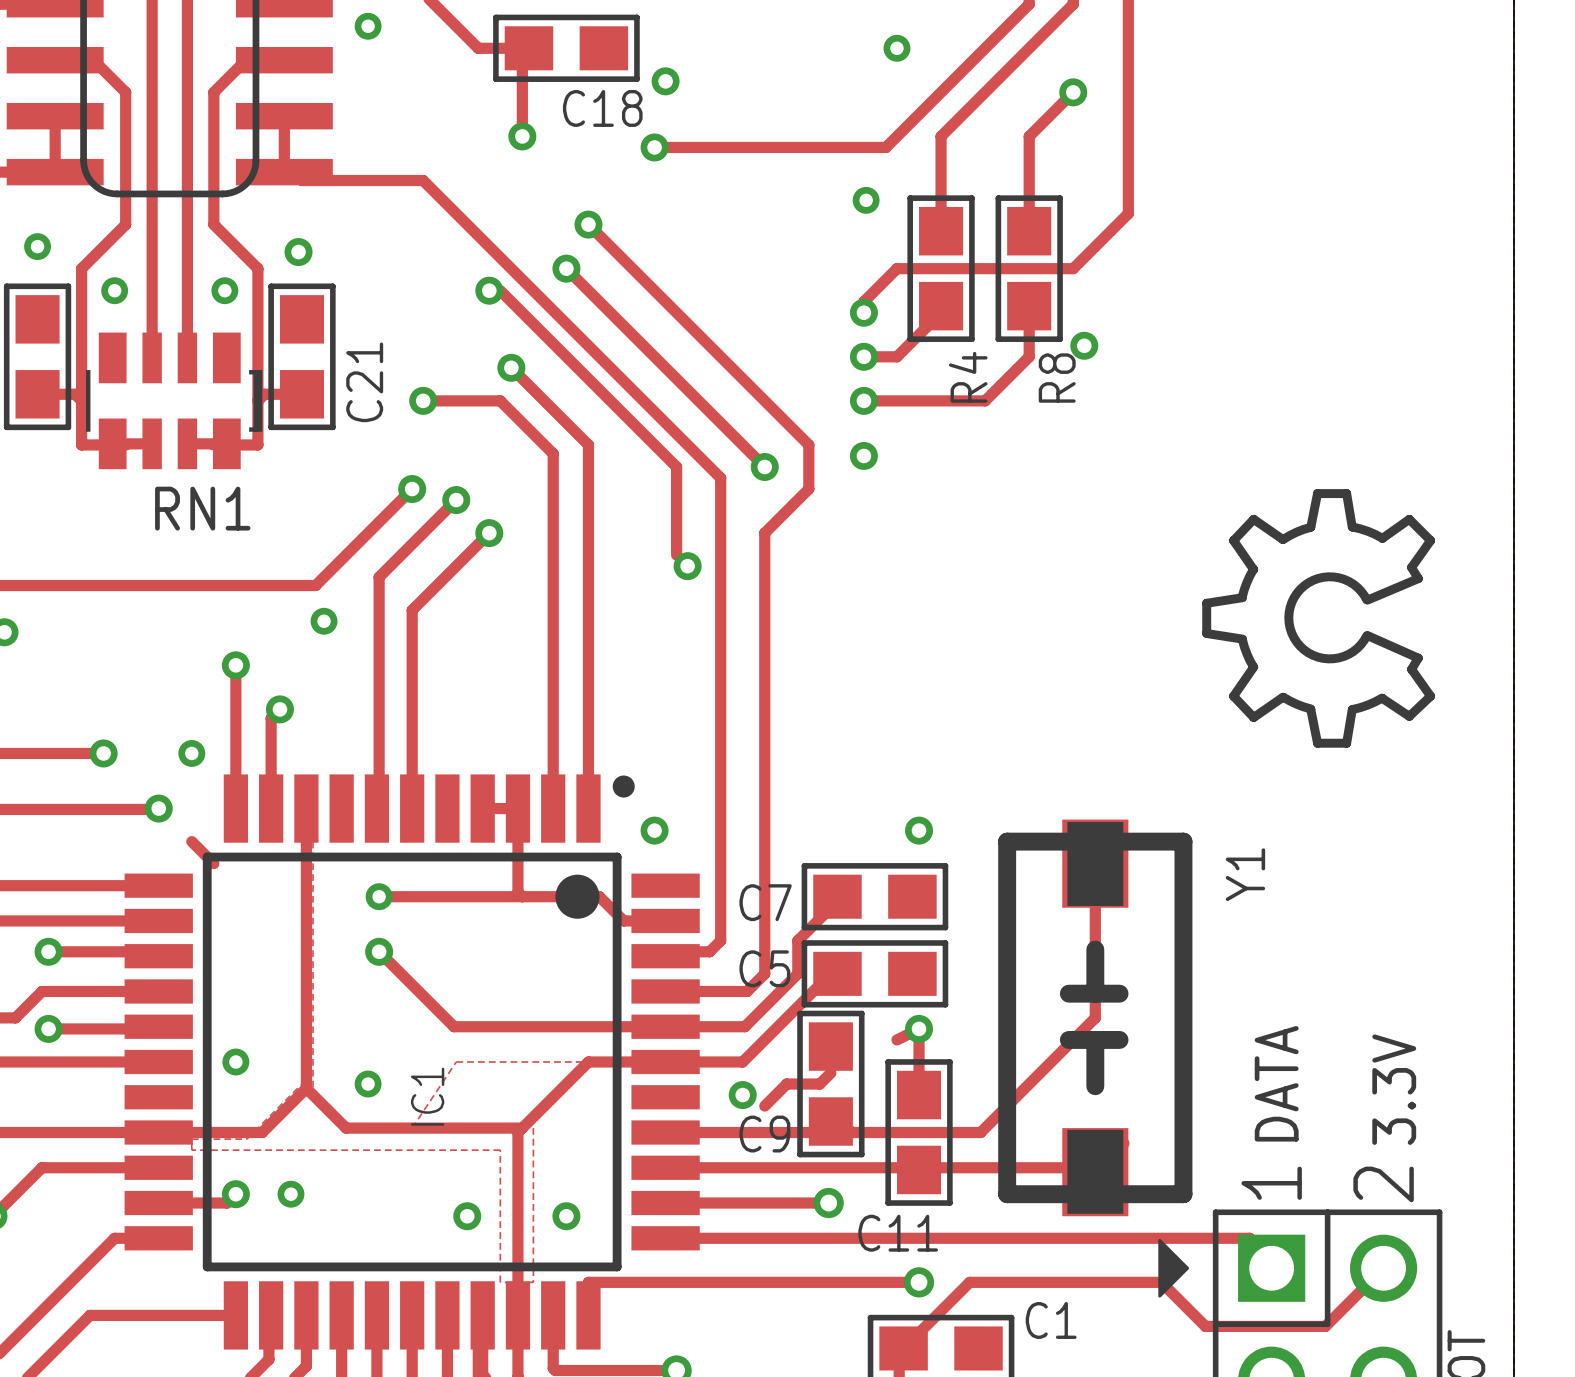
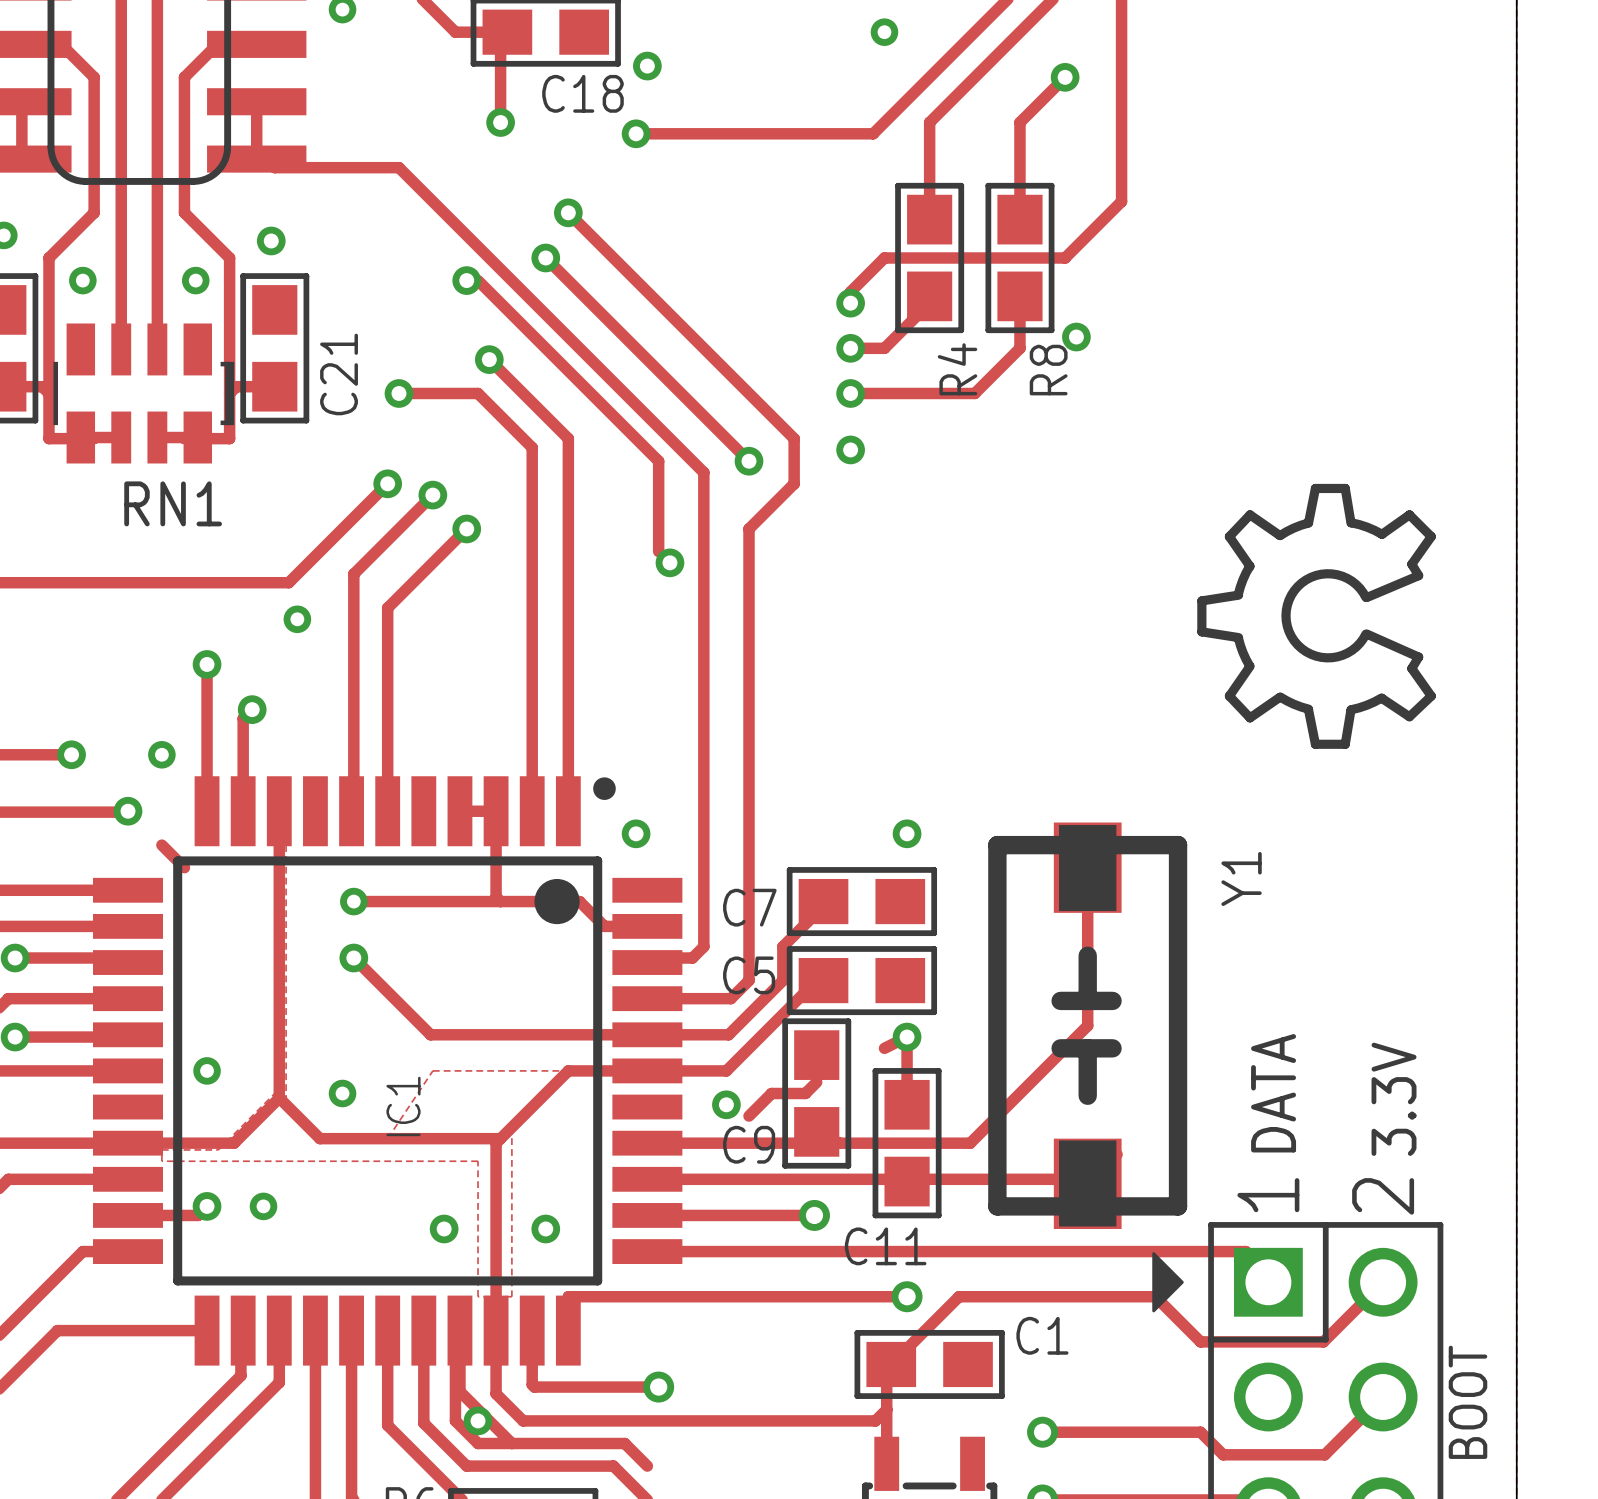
via: (866, 200) -> none

